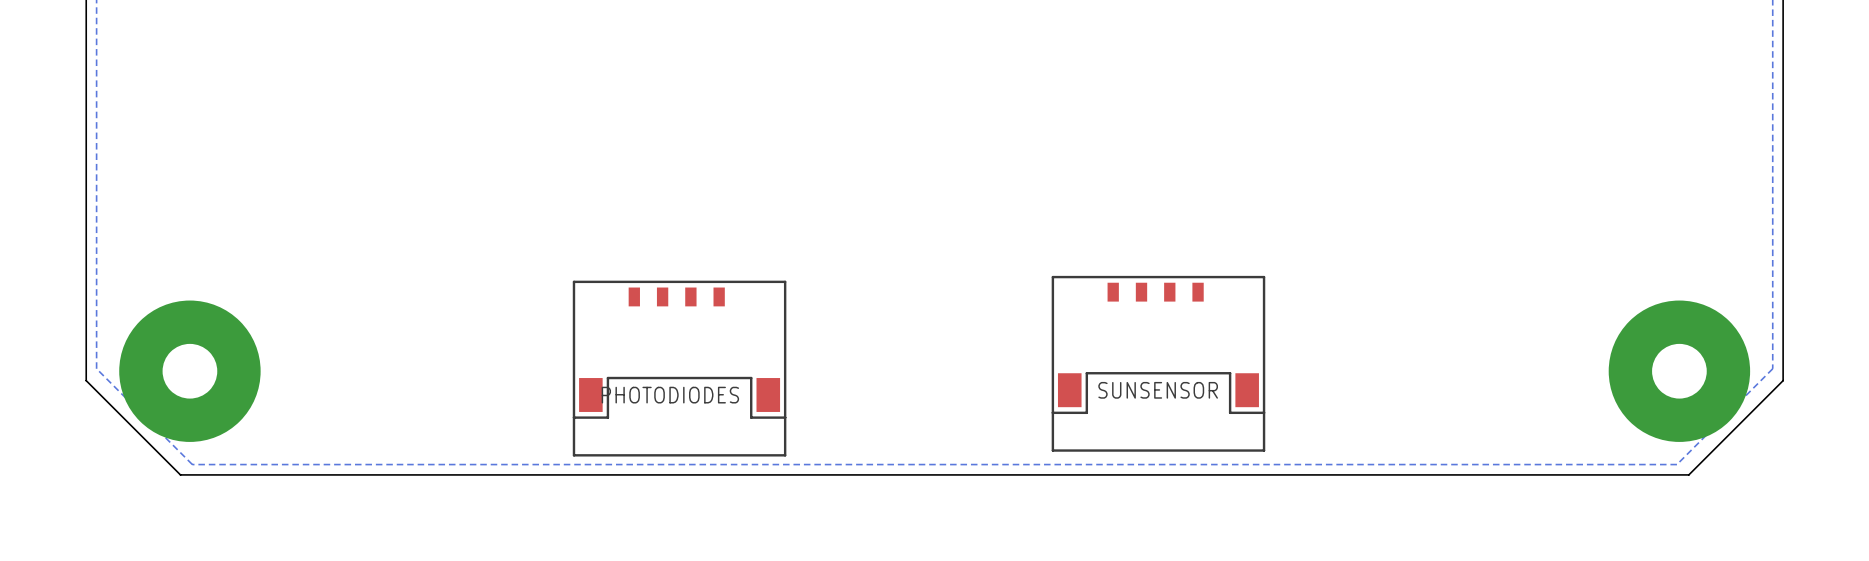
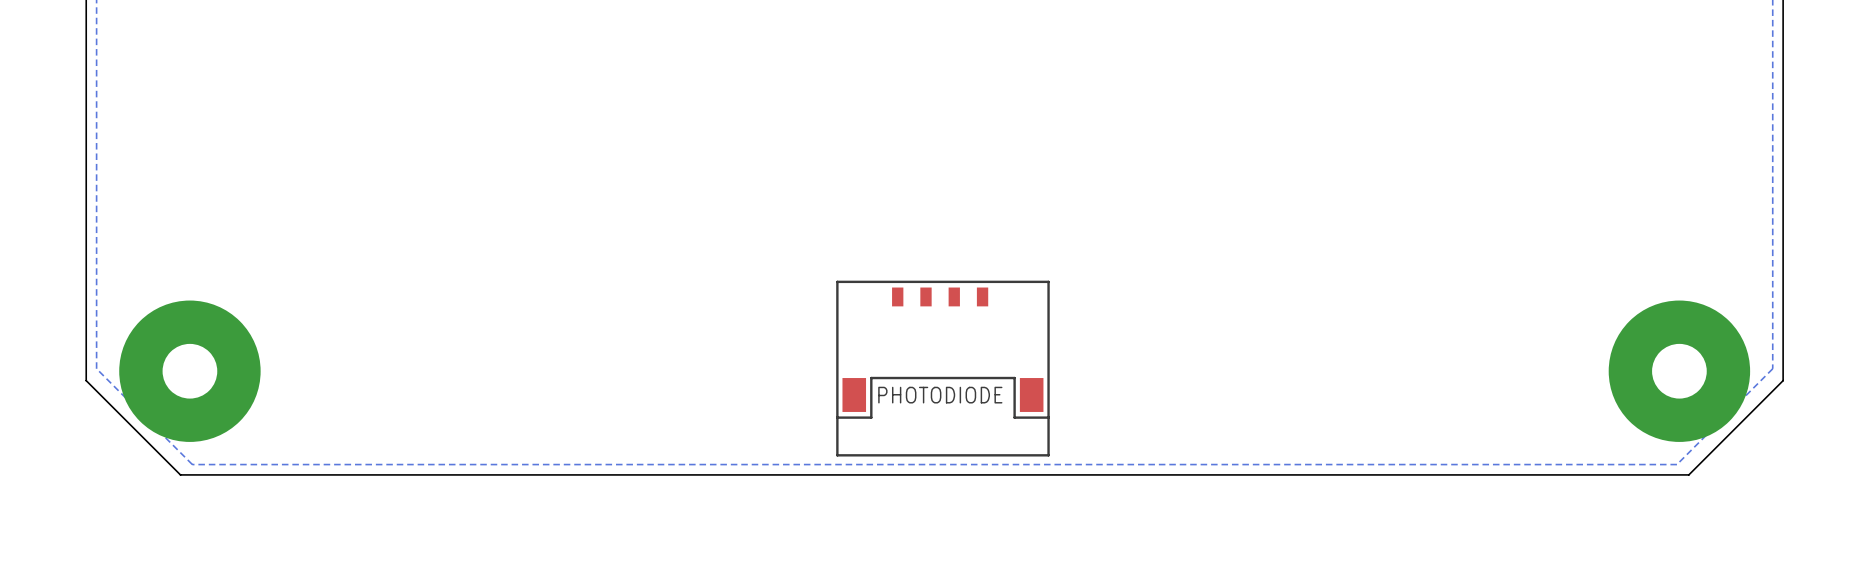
SUNSENSOR: (1158, 363) -> none
PHOTODIODES: (679, 368) -> none
PHOTODIODE: none -> (942, 368)

